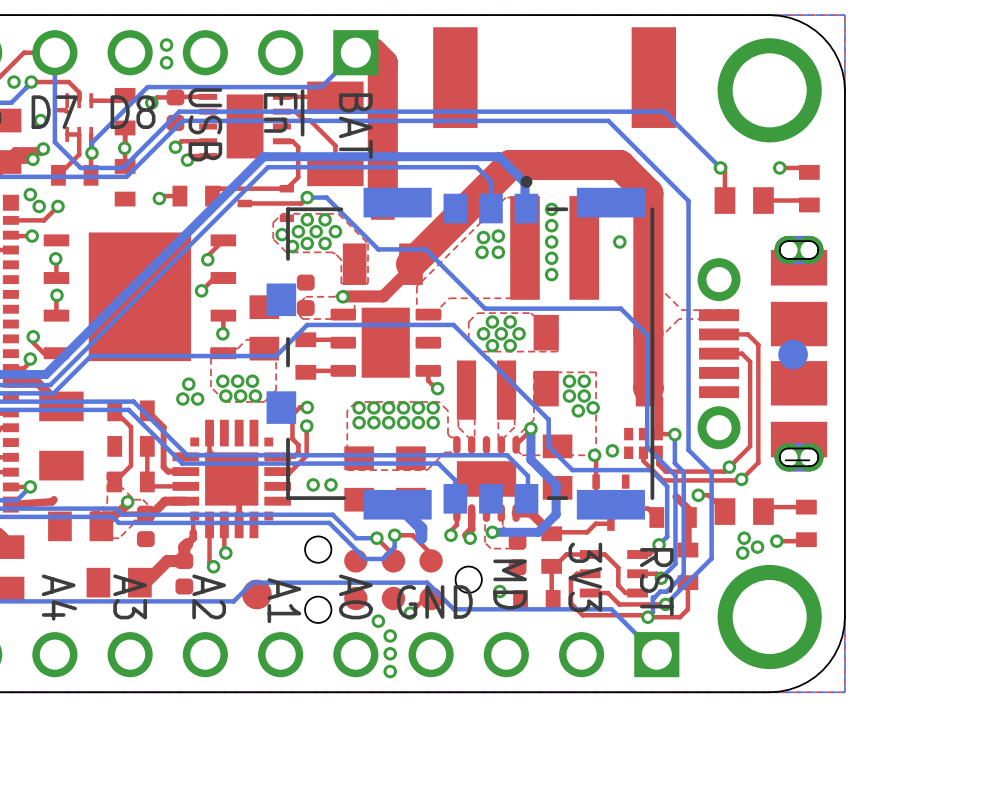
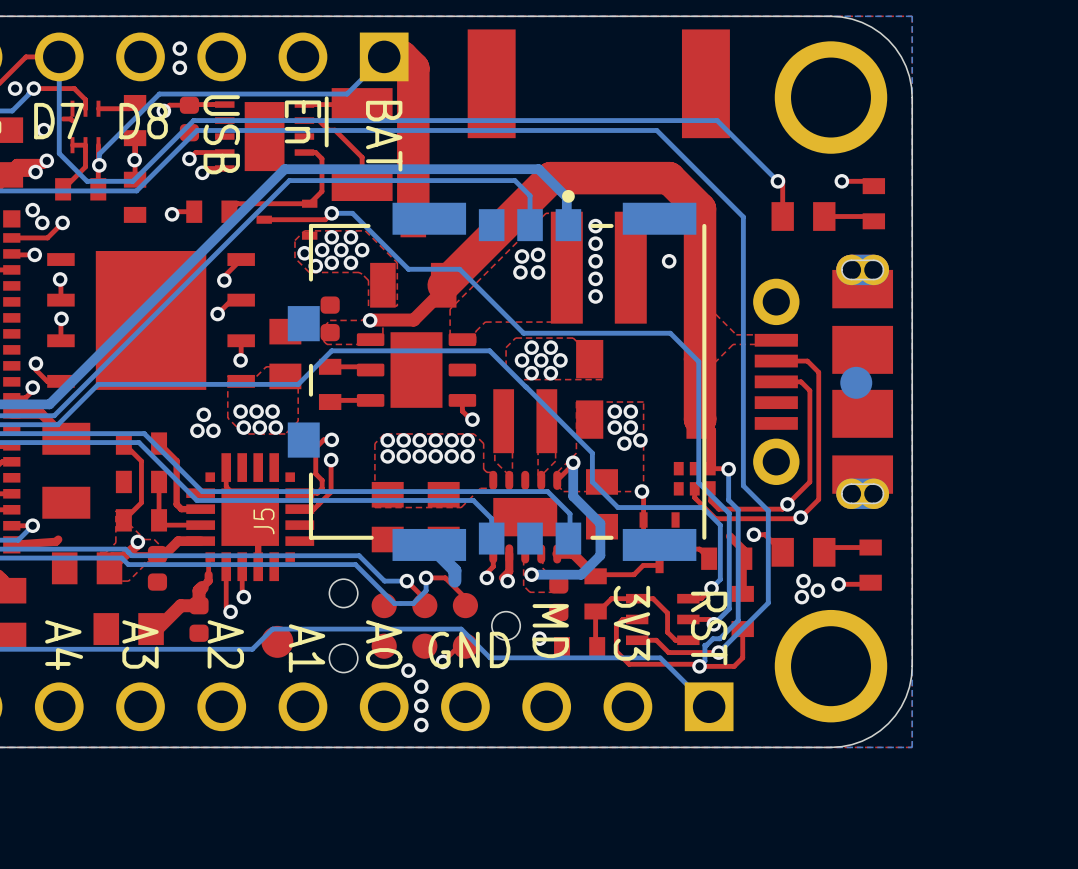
part footprint: [697, 235, 828, 472] -> [753, 254, 894, 509]
via: (612, 450) -> none
J5 name: none -> J5 (263, 521)
via: (313, 484) -> none
via: (330, 484) -> none

